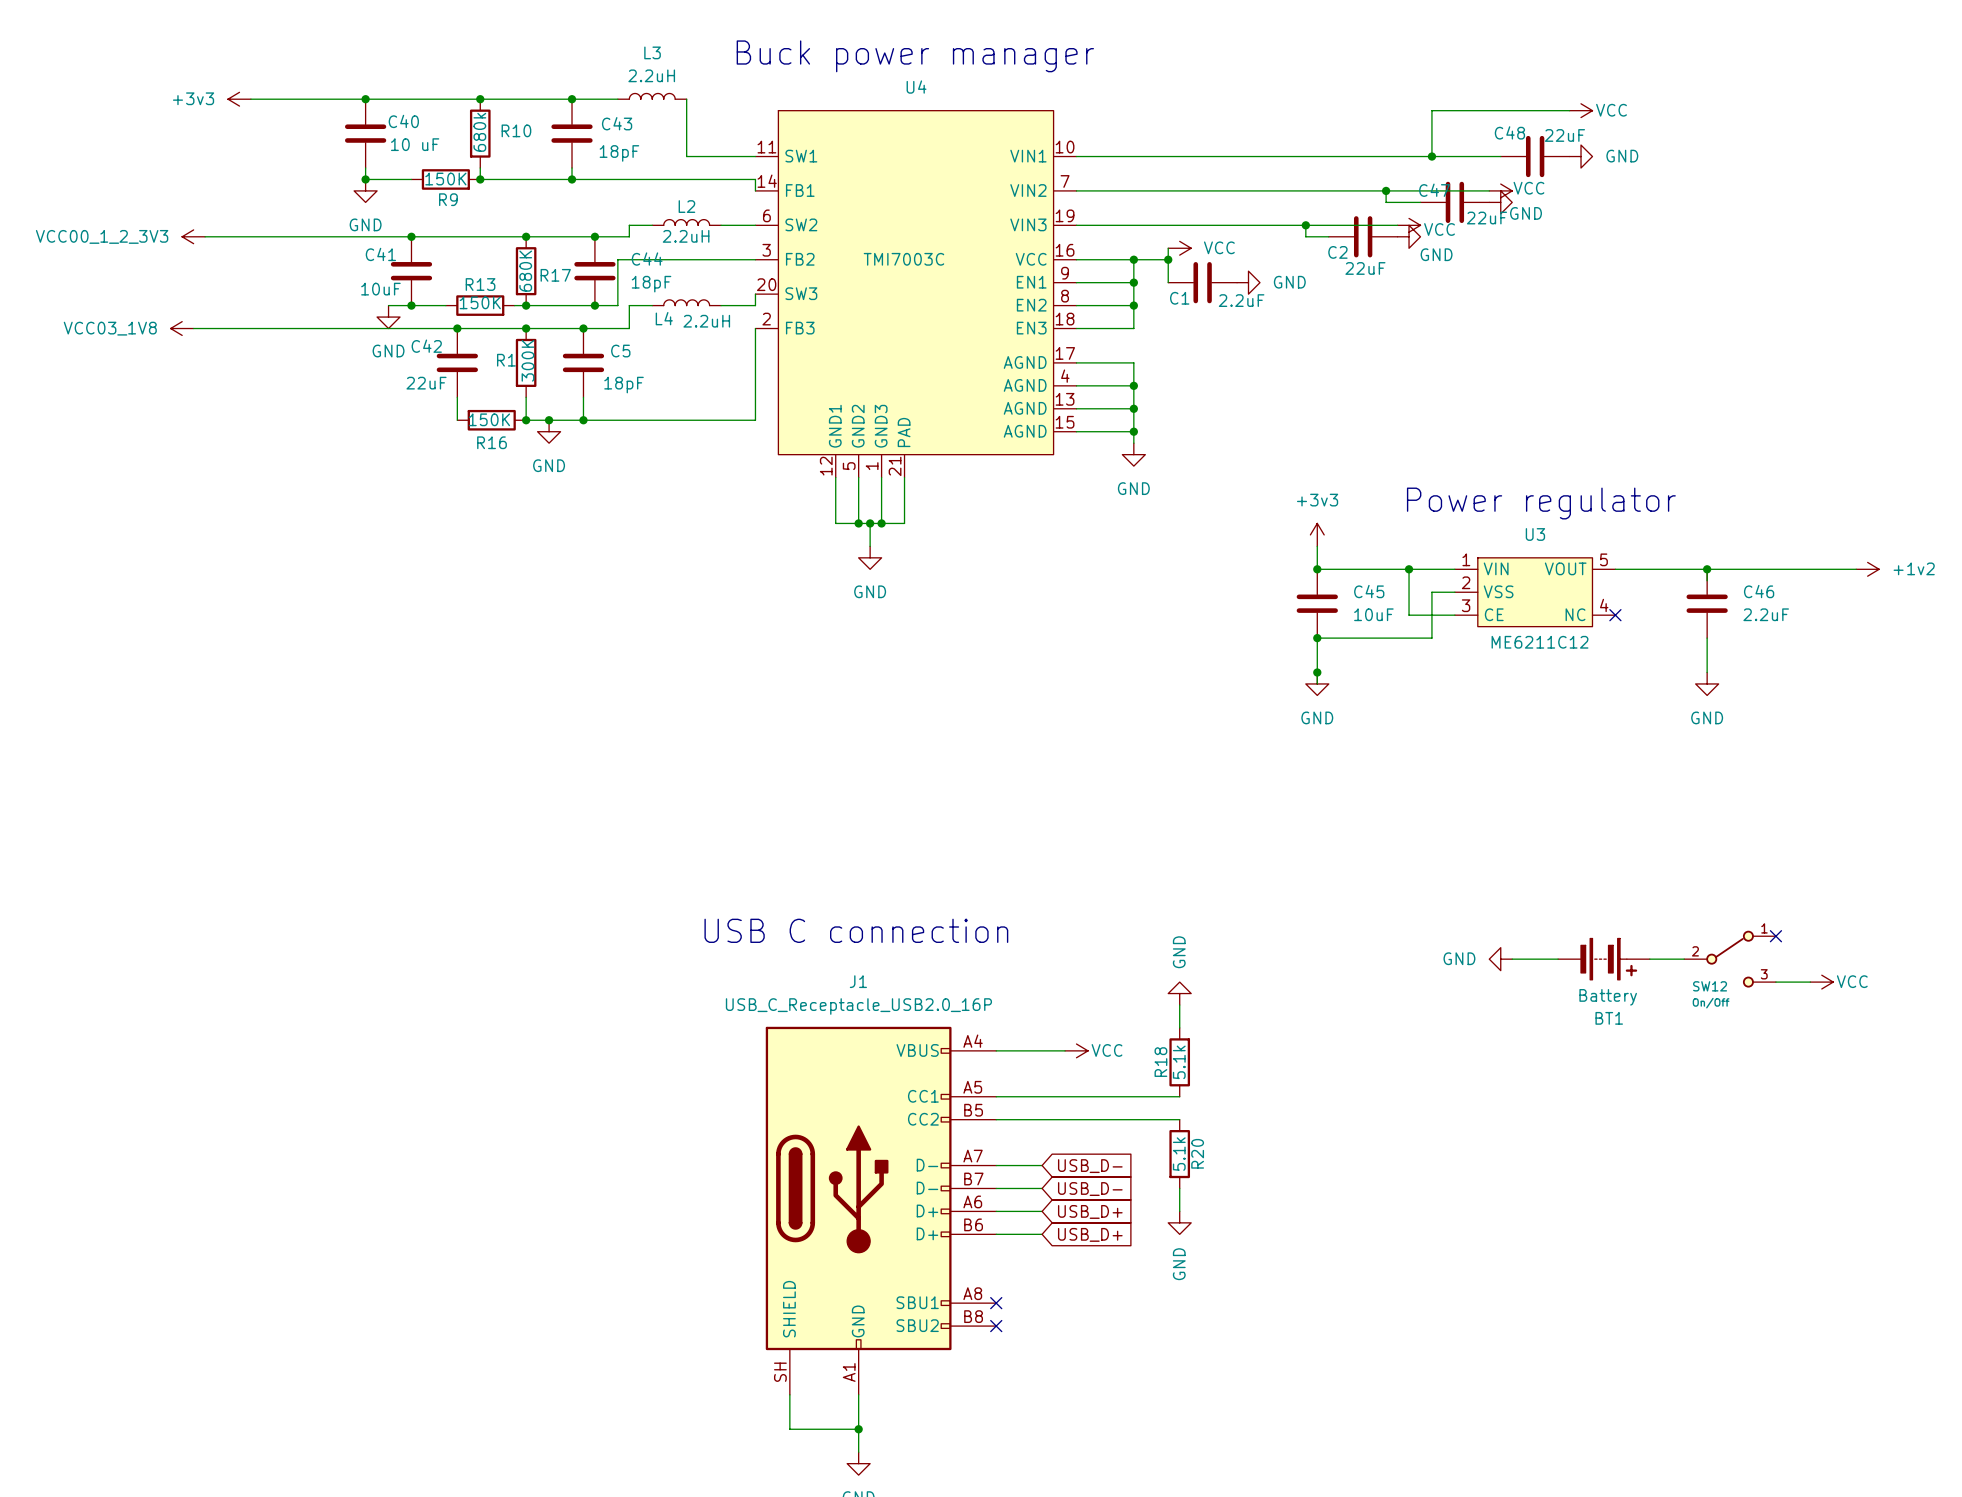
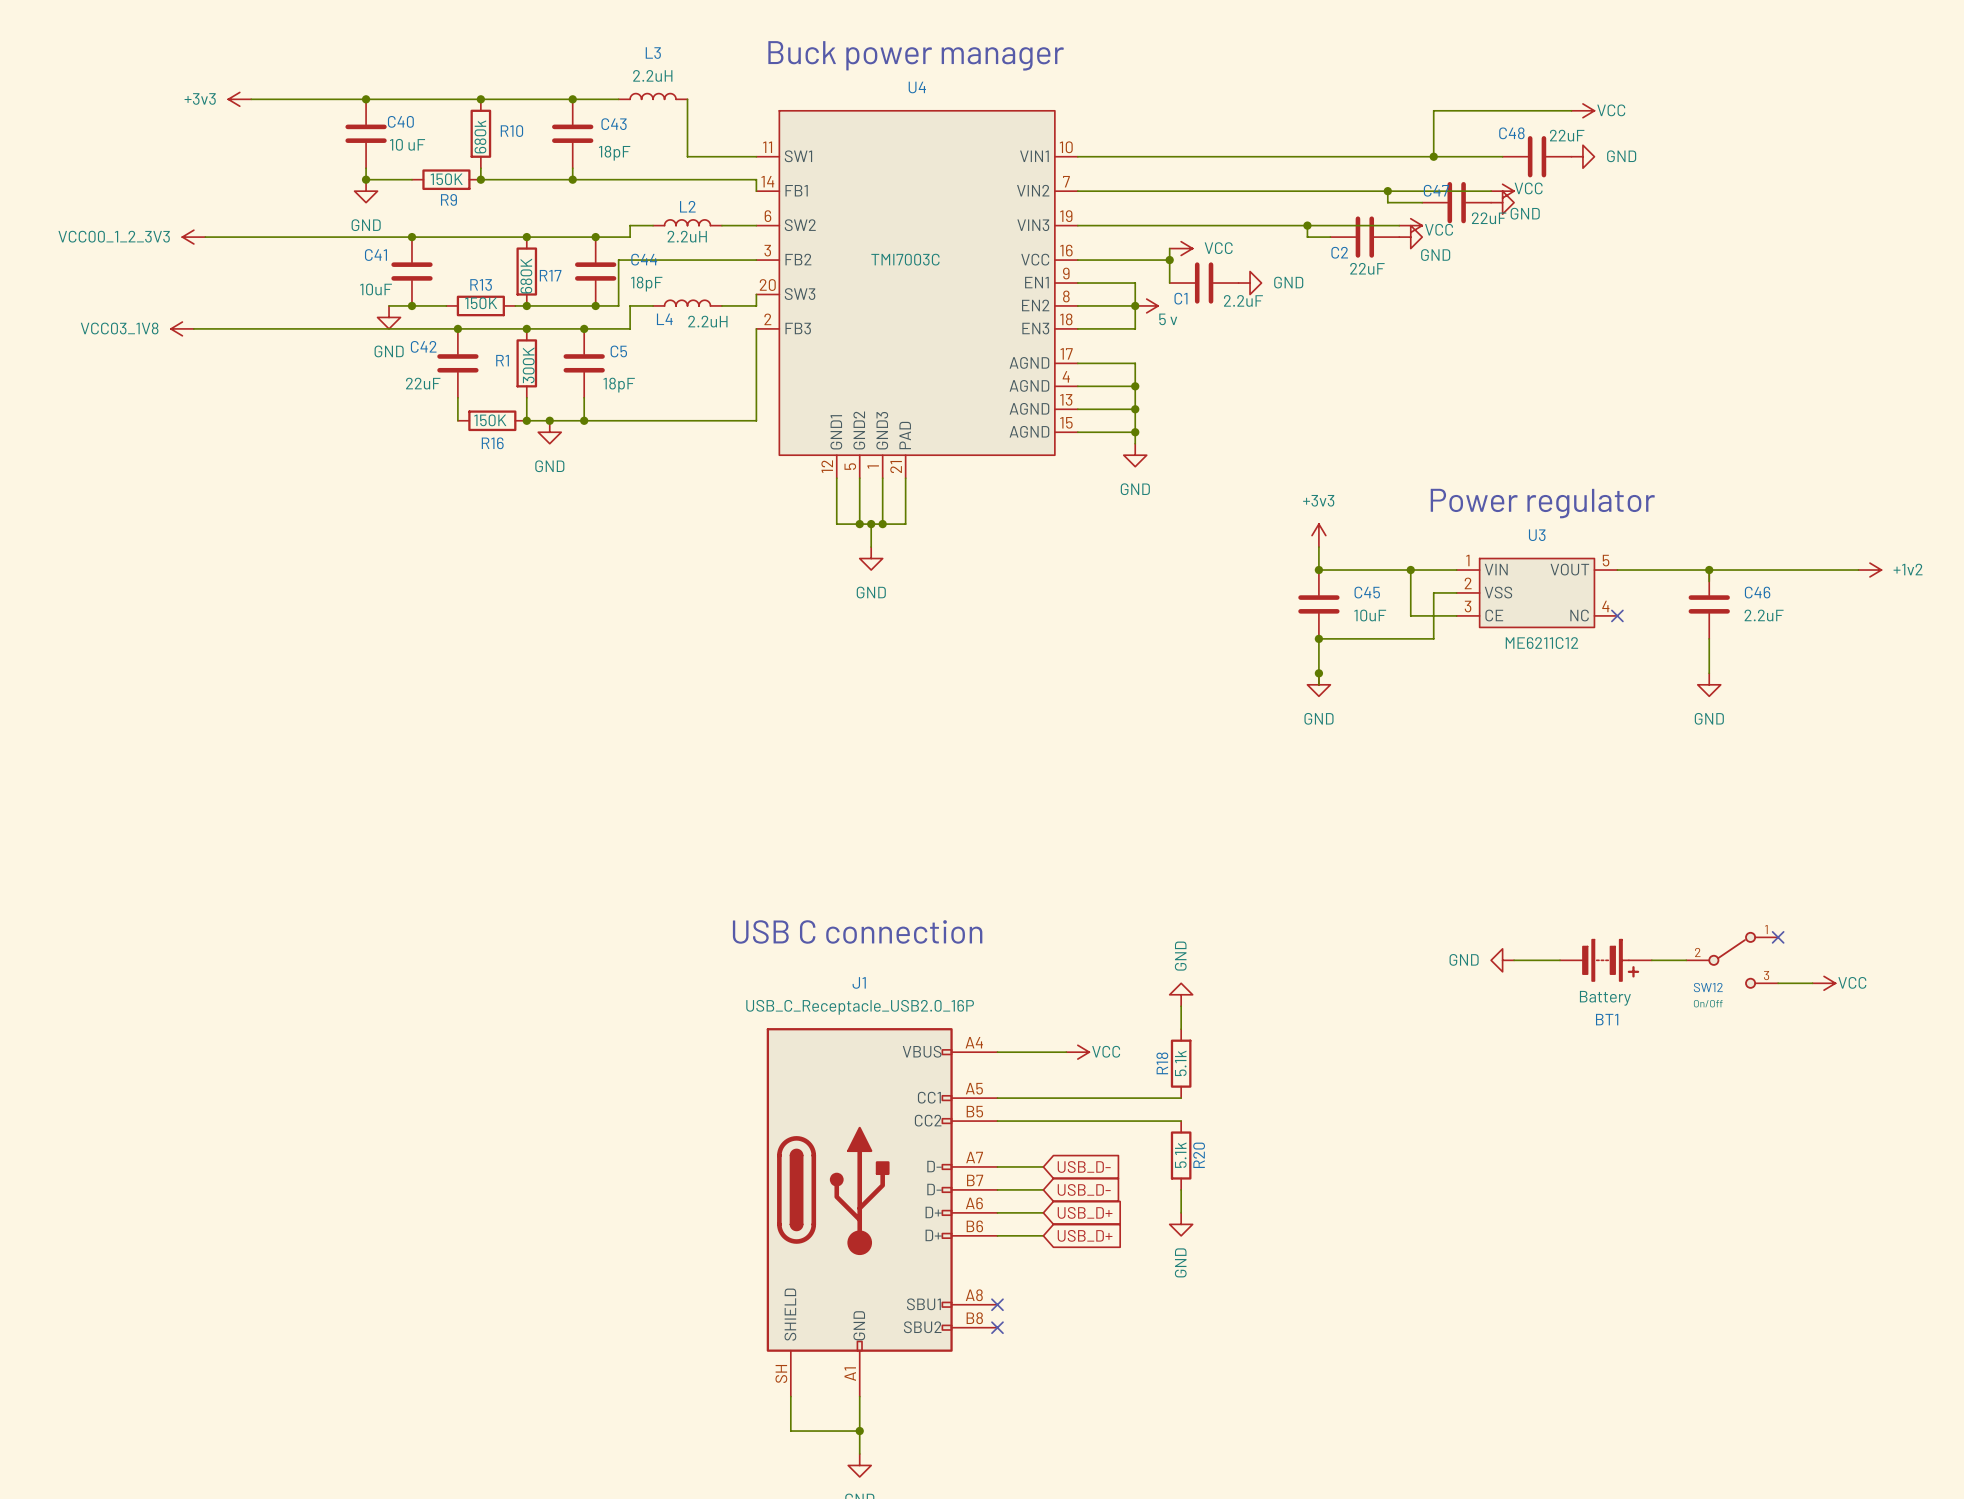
wire: (1133, 259) (1133, 282) -> none
junction: (1133, 259) -> none
junction: (1133, 282) -> none
power symbol: none -> 5 v (1146, 305)

